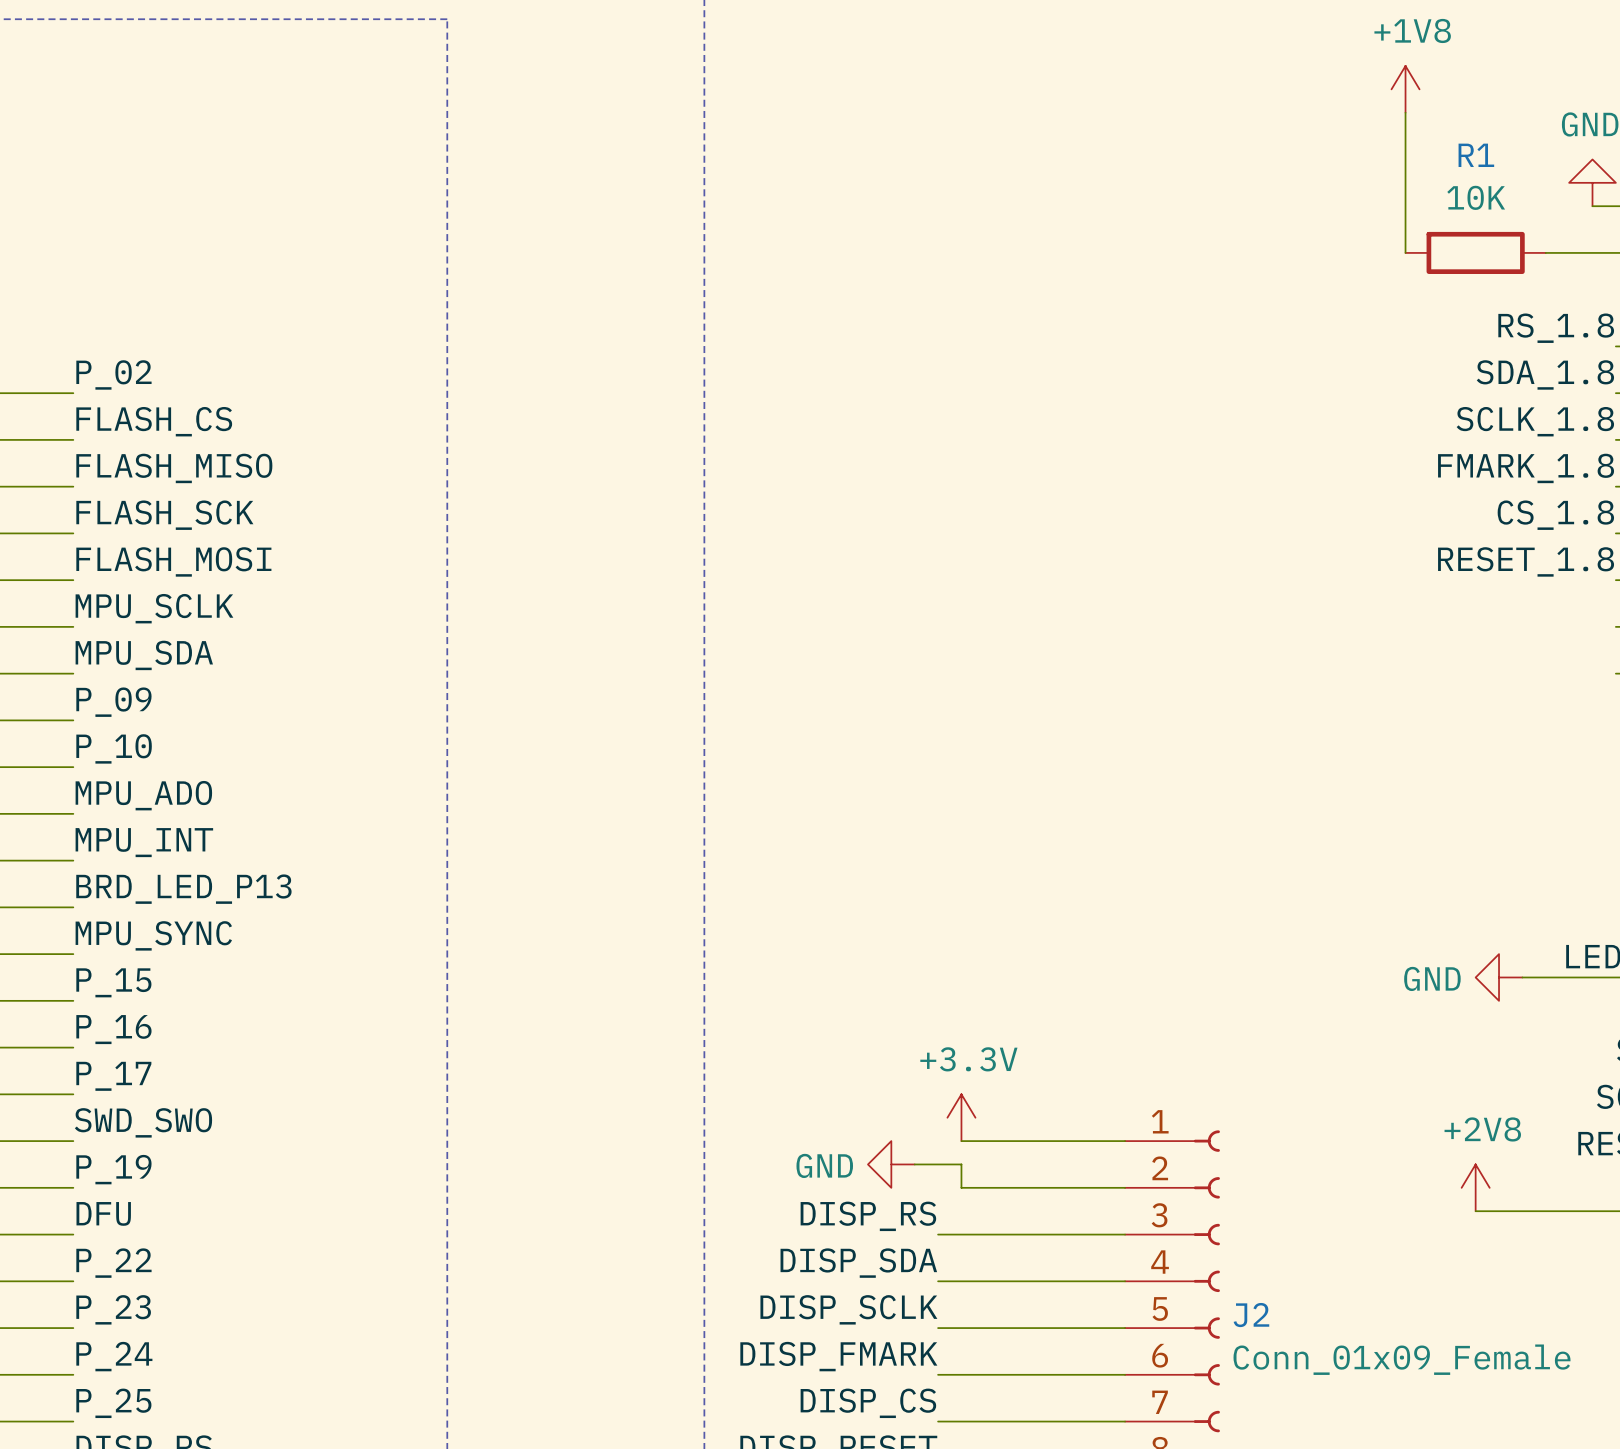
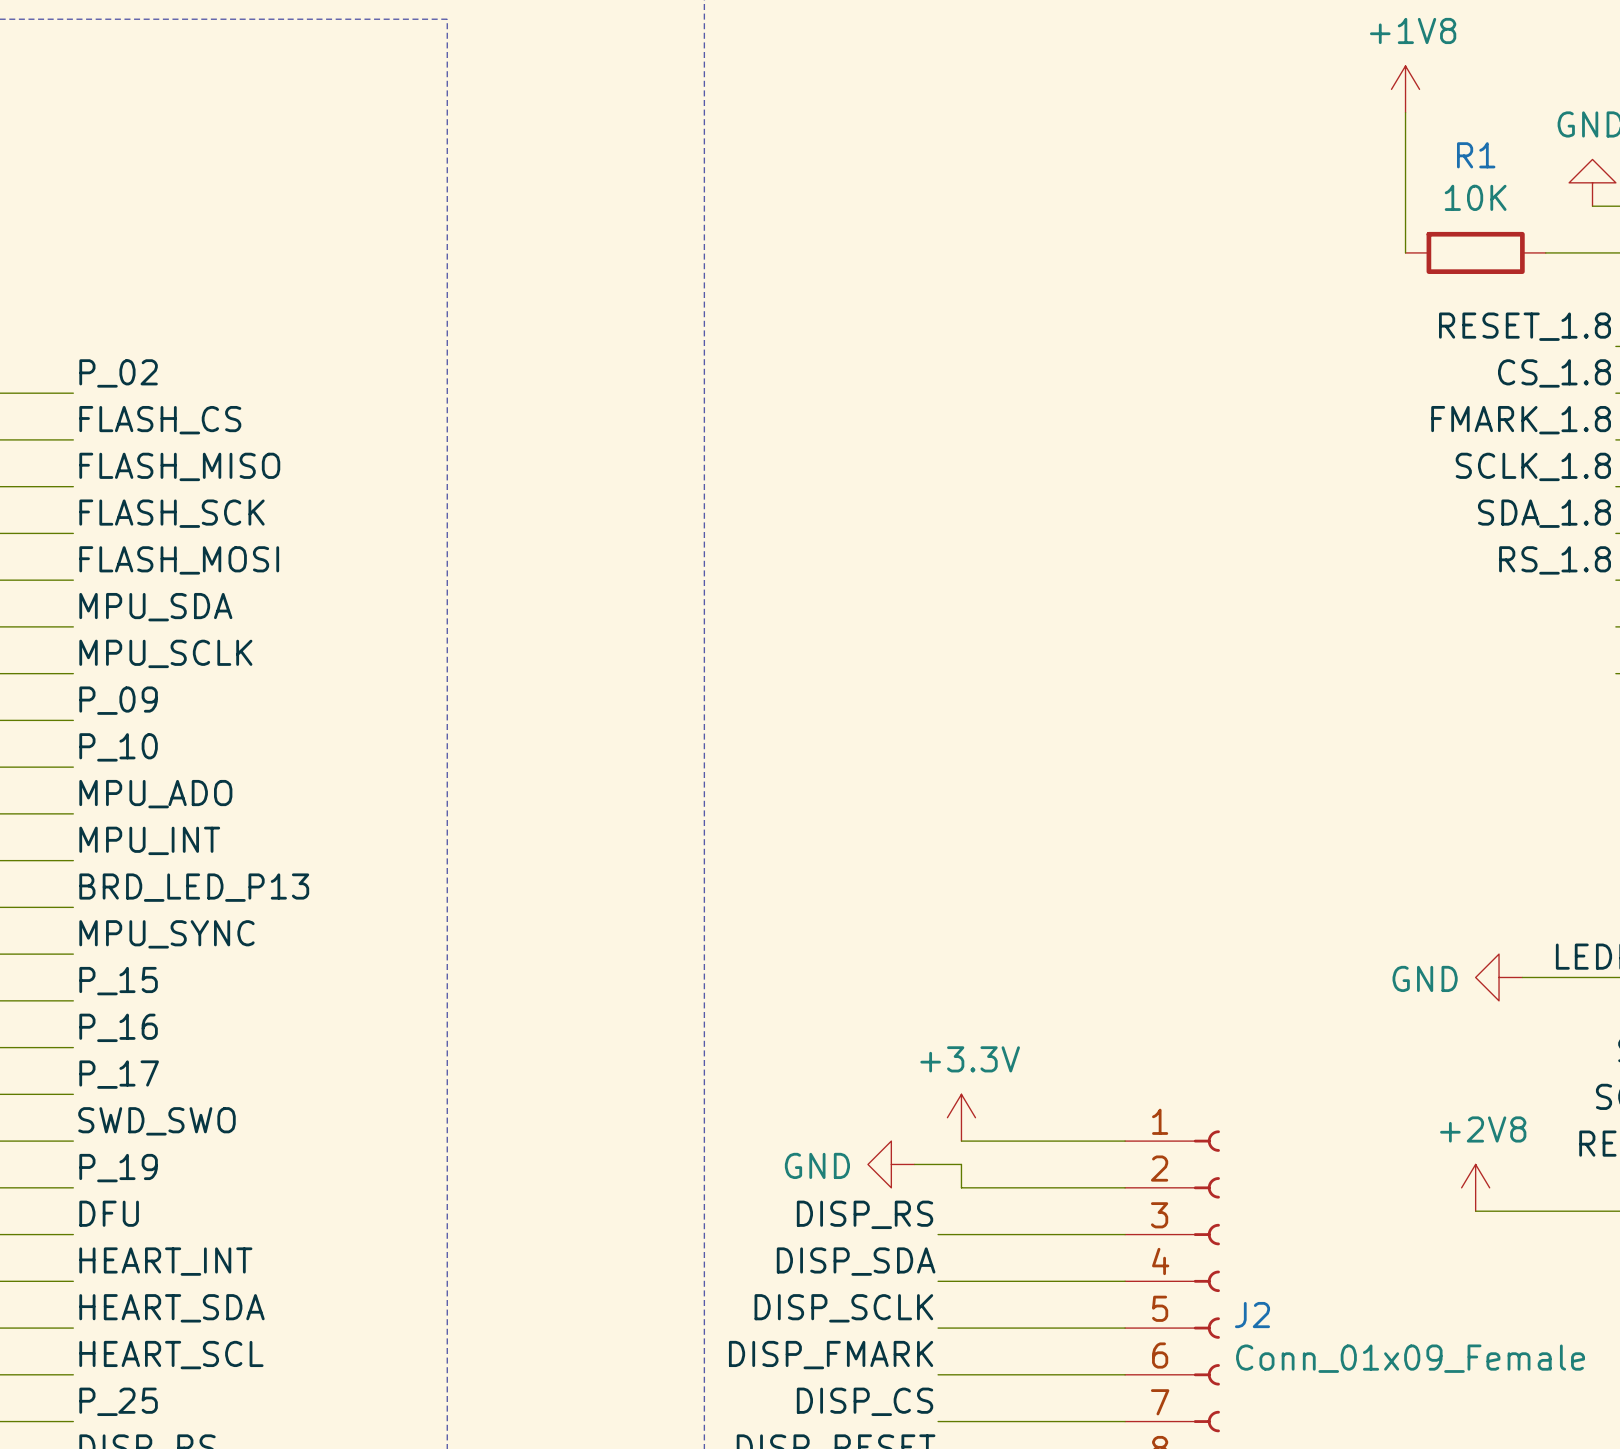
label: RS_1.8 (1556, 328) -> RESET_1.8 (1524, 326)
label: SDA_1.8 (1545, 374) -> CS_1.8 (1554, 373)
label: SCLK_1.8 (1535, 421) -> FMARK_1.8 (1521, 420)
label: FMARK_1.8 (1526, 468) -> SCLK_1.8 (1533, 466)
label: CS_1.8 (1555, 515) -> SDA_1.8 (1544, 513)
label: RESET_1.8 (1526, 561) -> RS_1.8 (1555, 560)
label: MPU_SCLK (154, 608) -> MPU_SDA (155, 607)
label: MPU_SDA (144, 655) -> MPU_SCLK (165, 653)
label: P_22 (113, 1263) -> HEART_INT (165, 1261)
label: P_23 (113, 1309) -> HEART_SDA (171, 1308)
label: P_24 (114, 1356) -> HEART_SCL (171, 1355)

